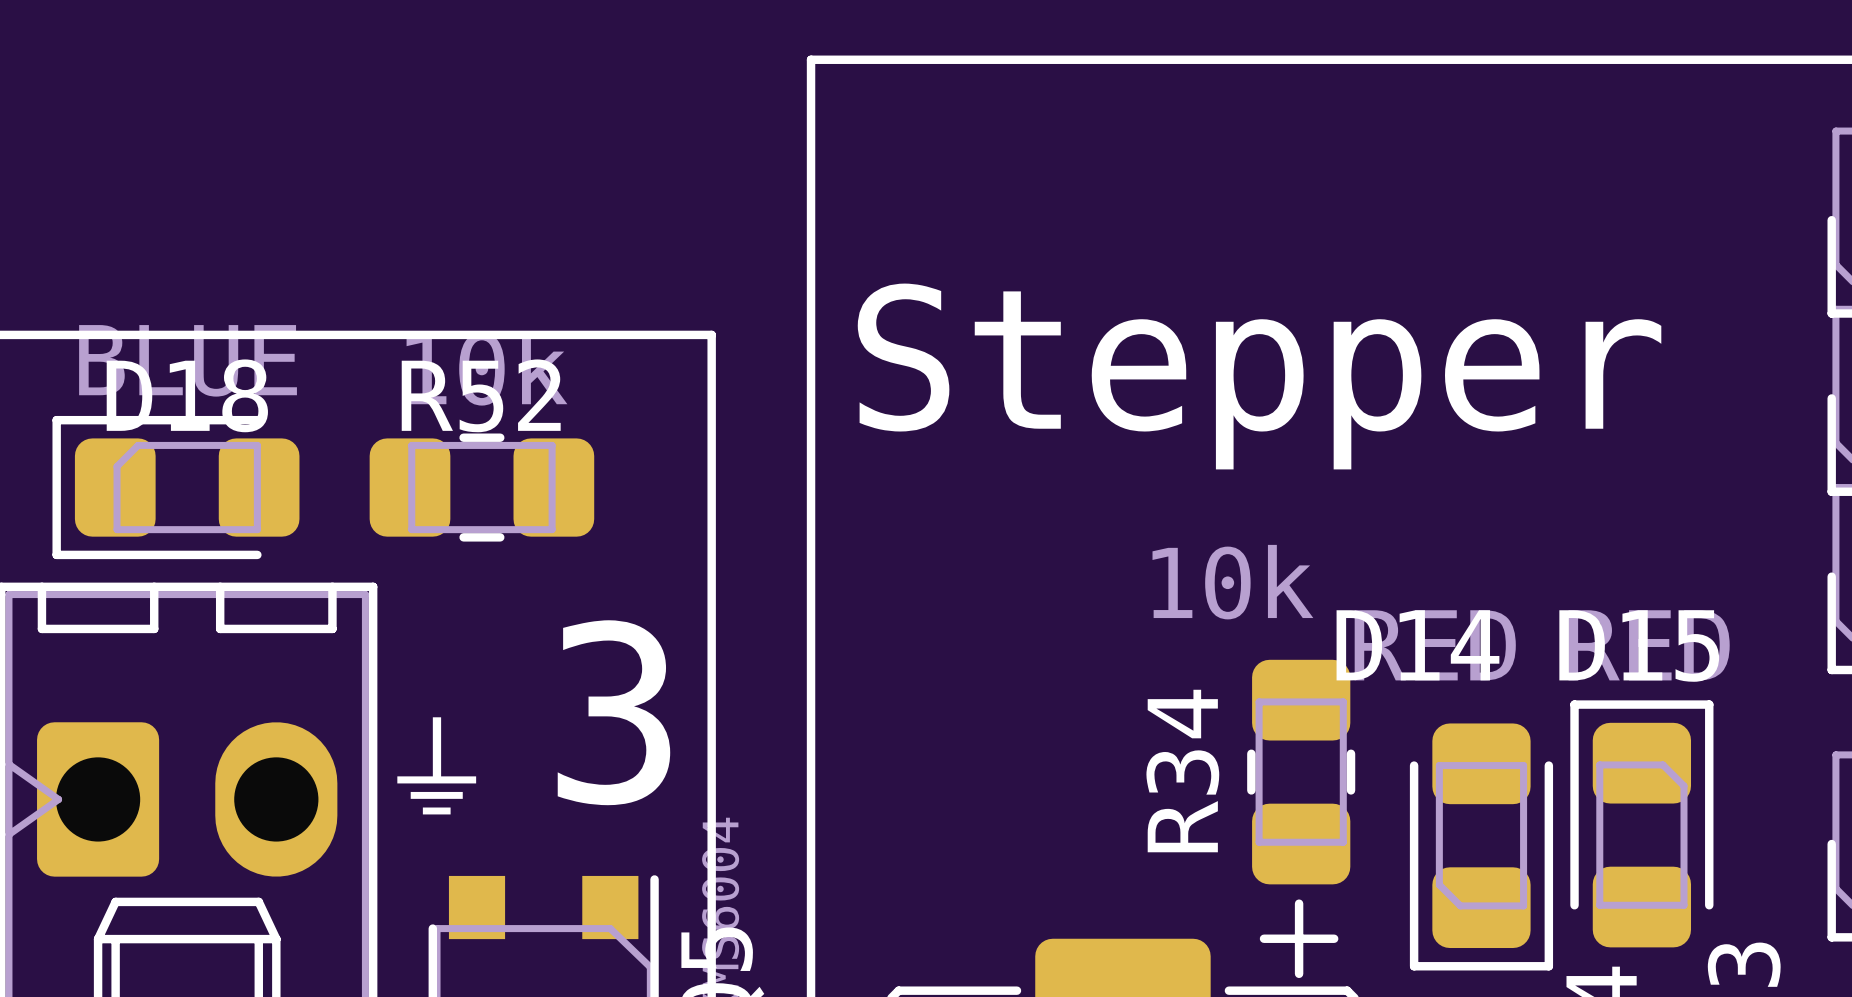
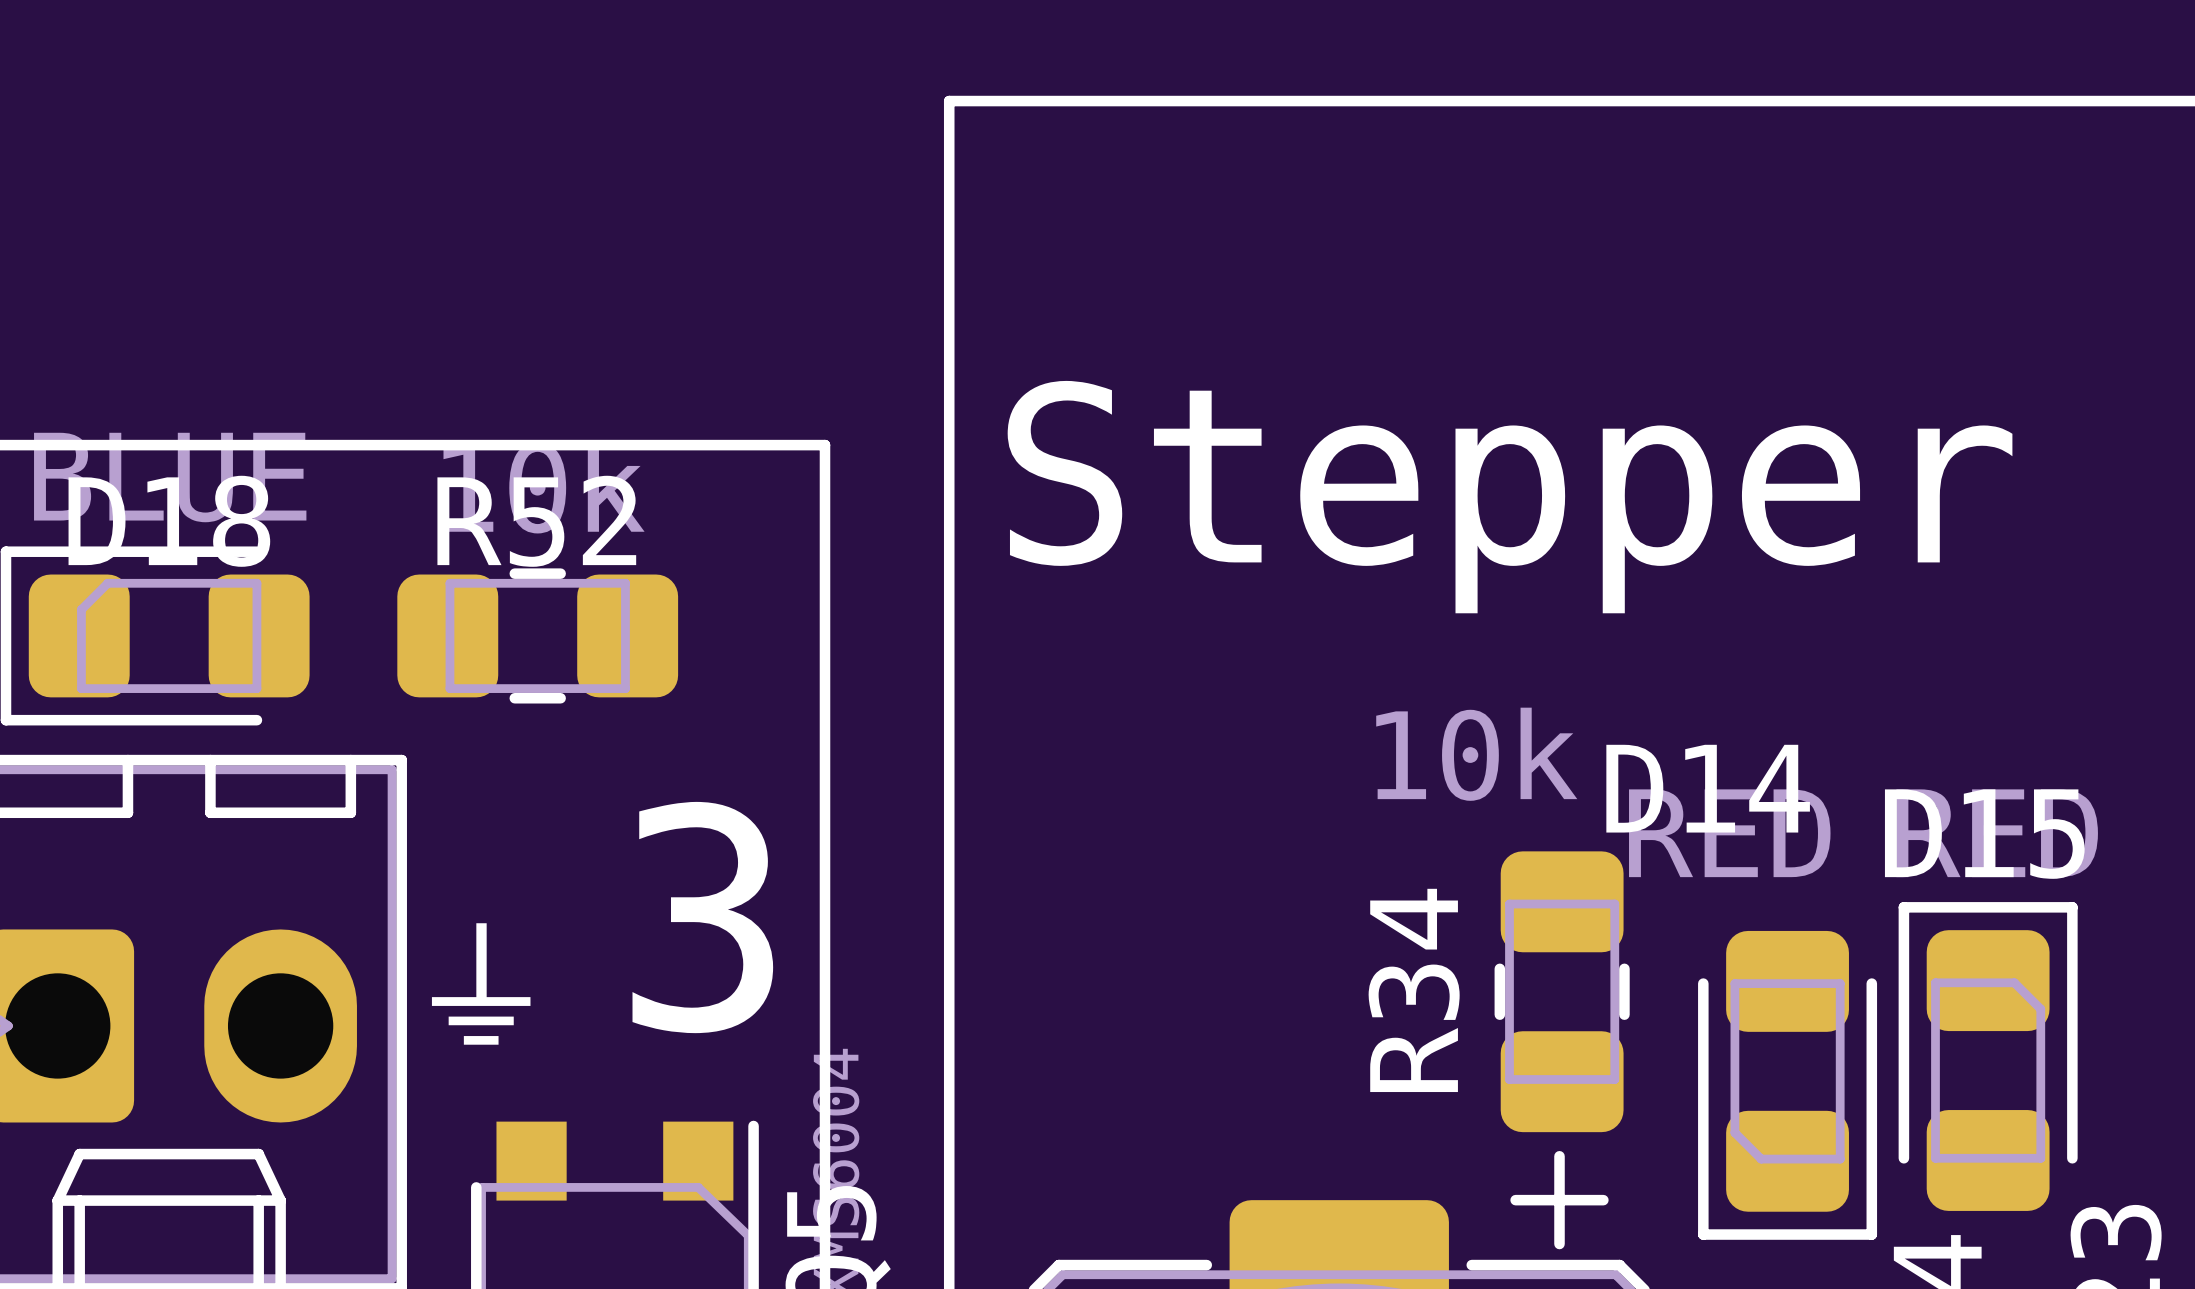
D14 name position: D14 (1417, 645) -> D14 (1708, 788)

